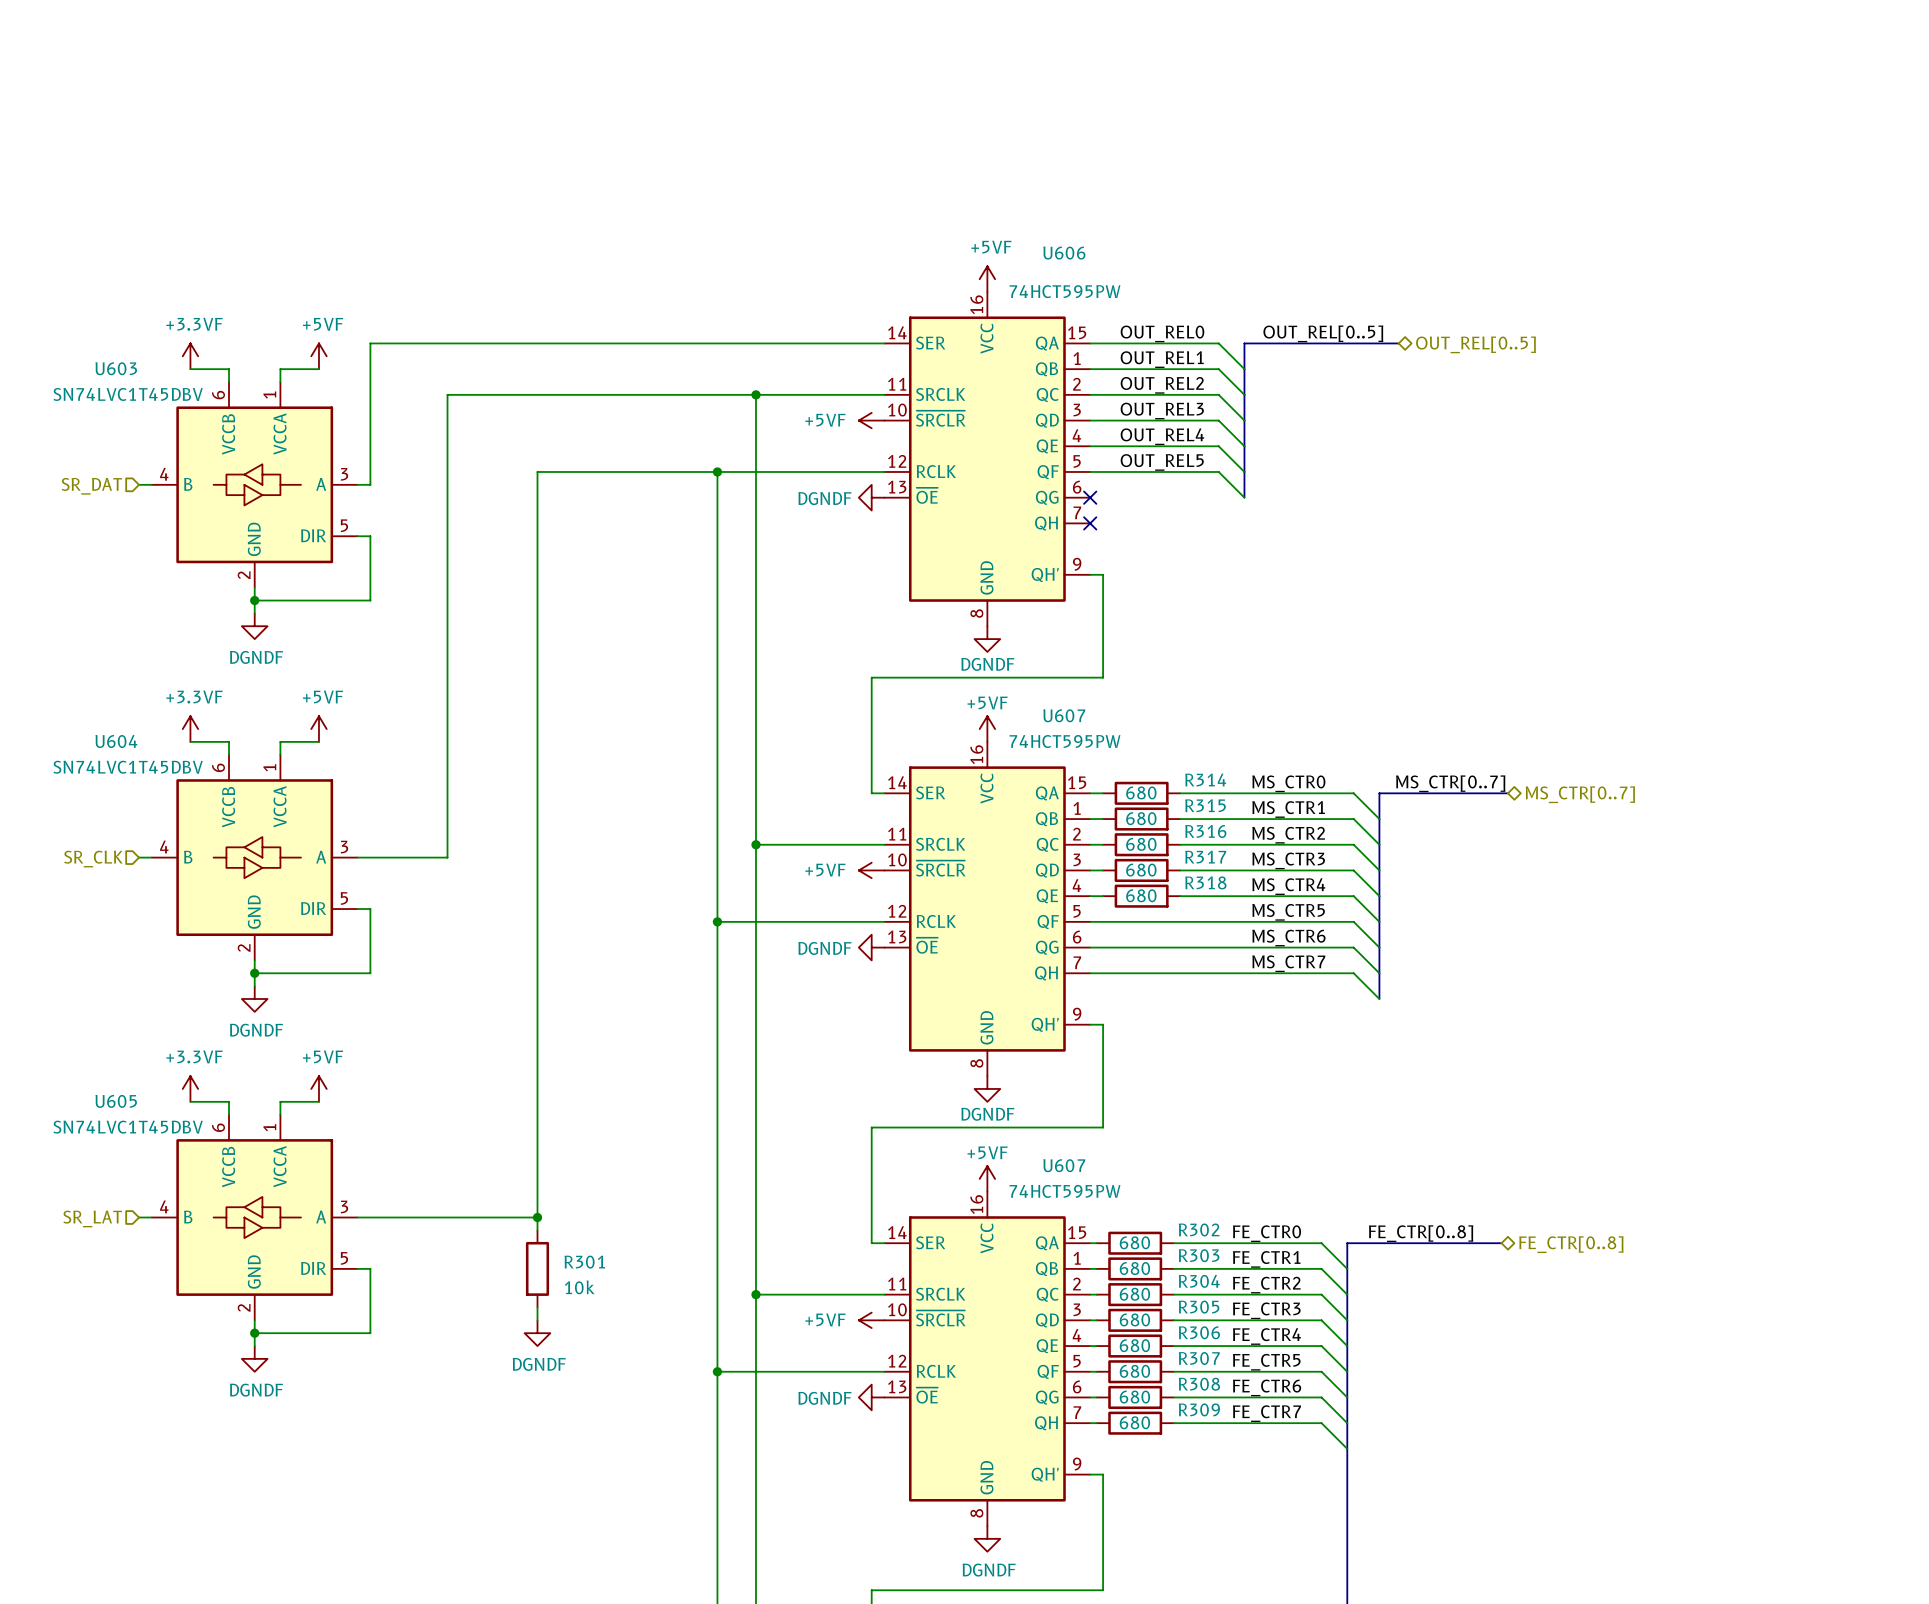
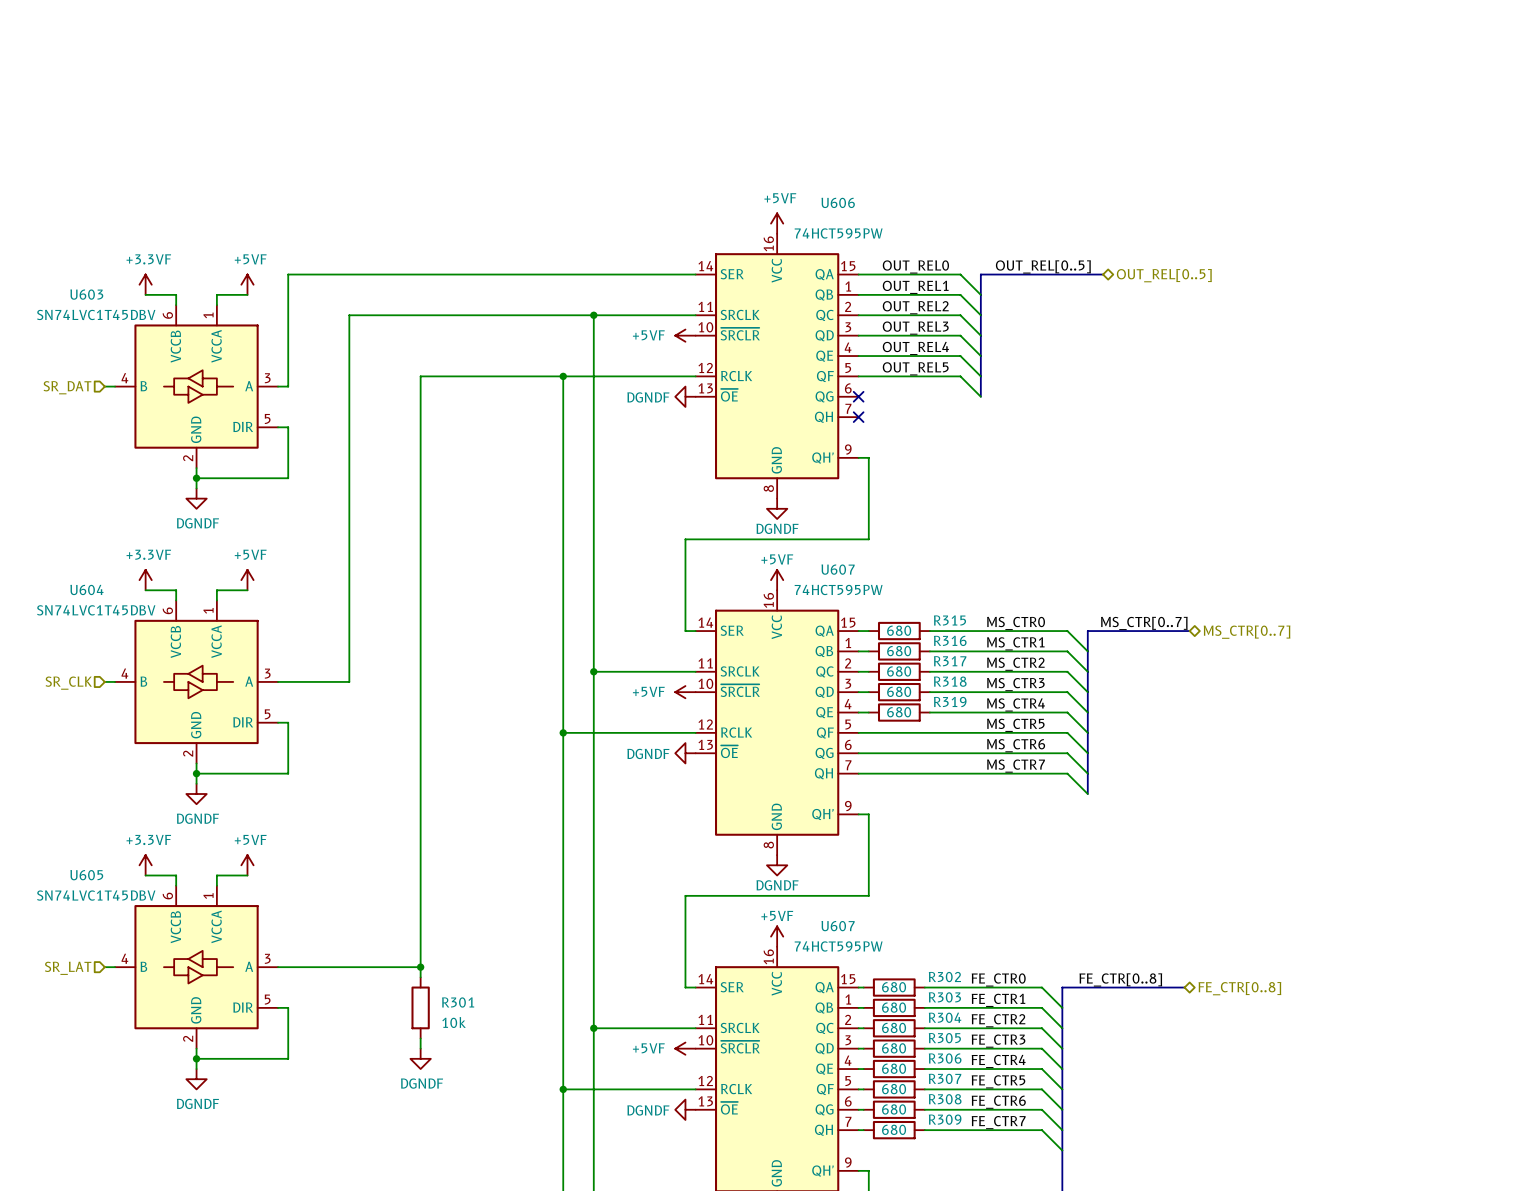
R314 name: R314 (1205, 780) -> R315 (949, 620)
R315 name: R315 (1205, 805) -> R316 (950, 640)
R316 name: R316 (1205, 831) -> R317 (950, 661)
R317 name: R317 (1205, 857) -> R318 (950, 681)
R318 name: R318 (1205, 882) -> R319 (950, 702)

